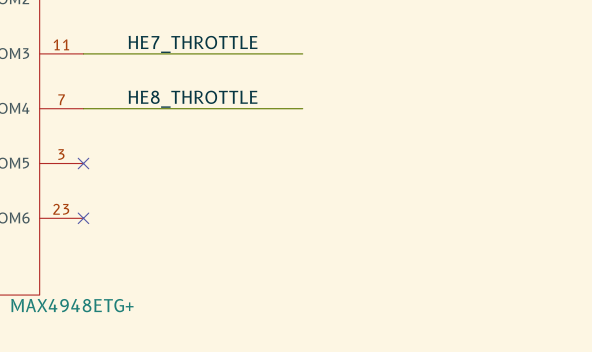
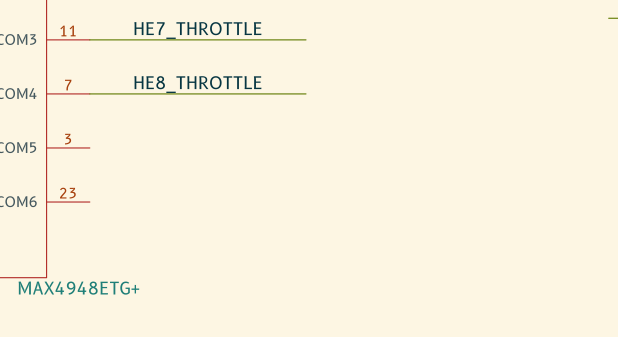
no-connect mark: (83, 163) -> none
no-connect mark: (83, 218) -> none

